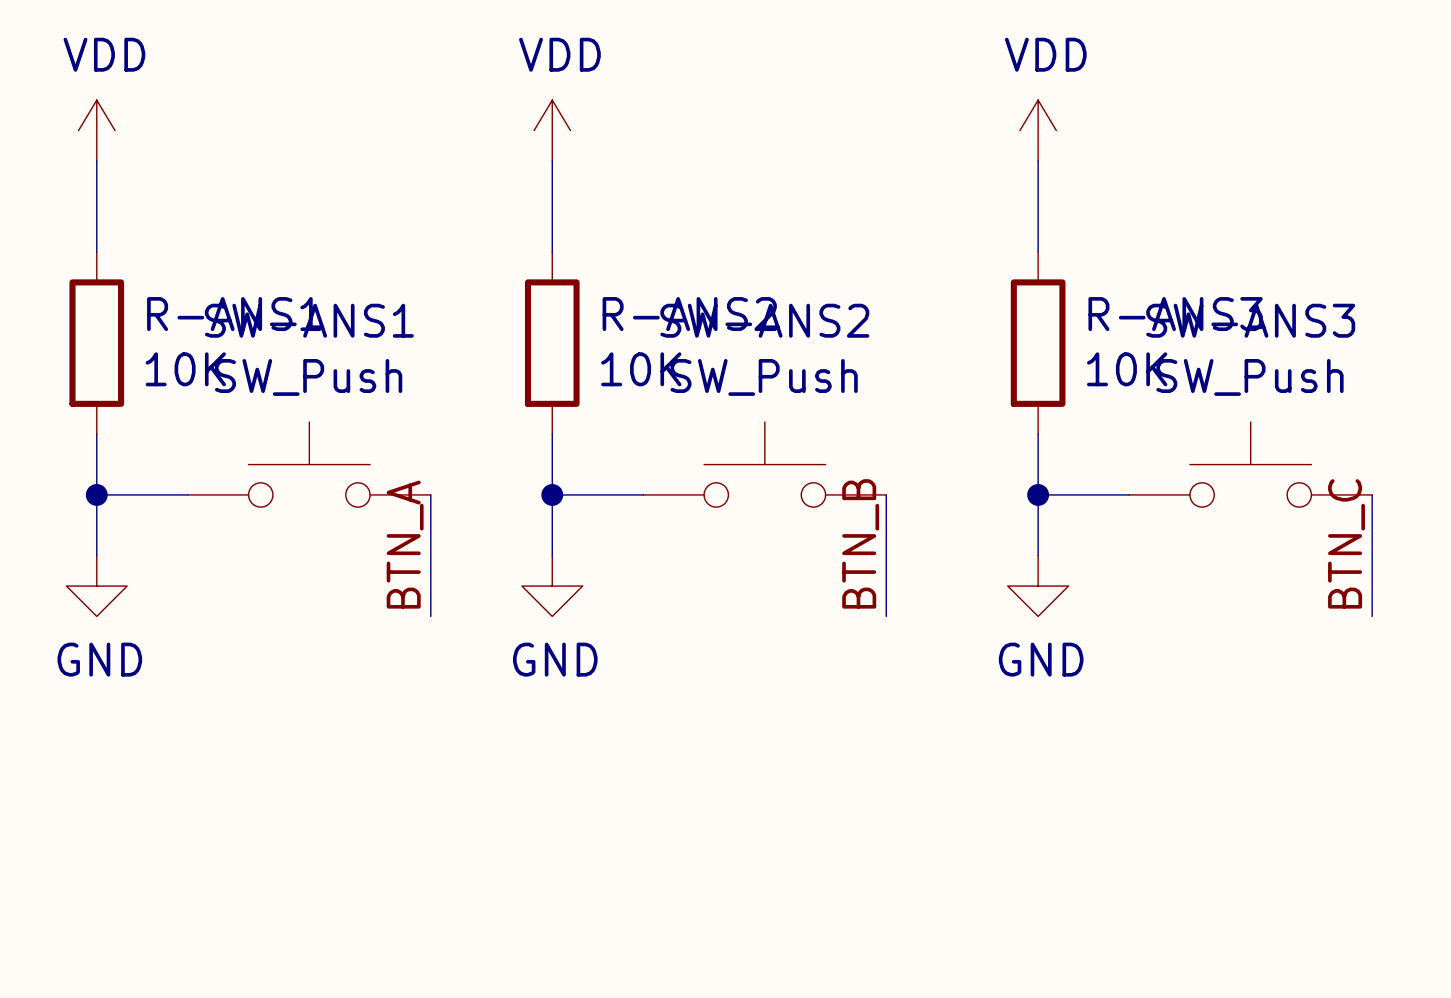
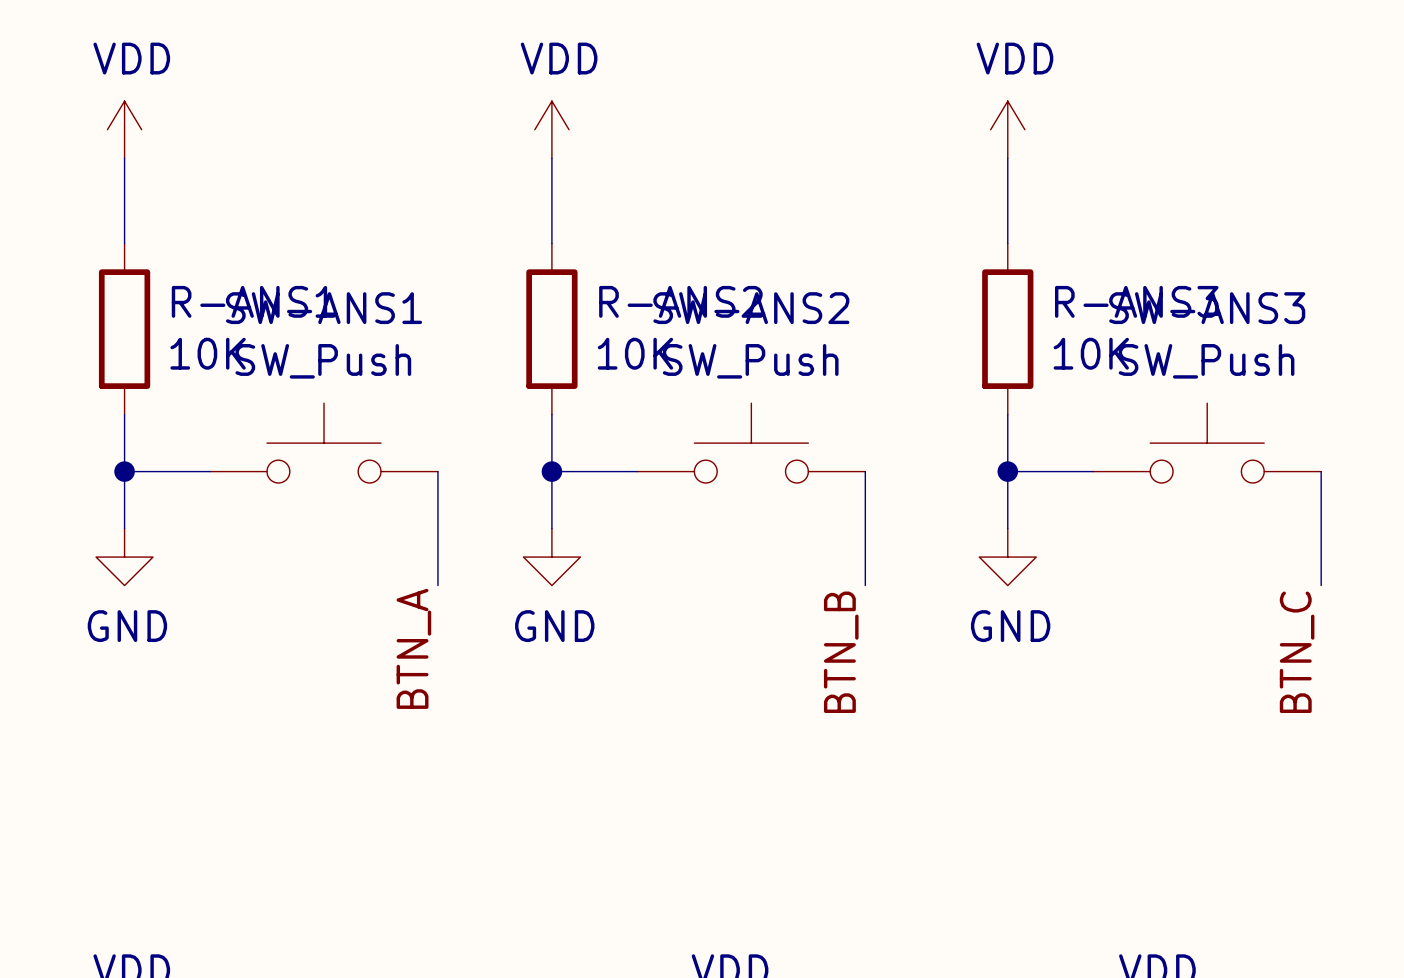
label position: BTN_B (860, 543) -> BTN_B (841, 652)
label position: BTN_C (1346, 543) -> BTN_C (1297, 652)
label position: BTN_A (405, 544) -> BTN_A (413, 648)

